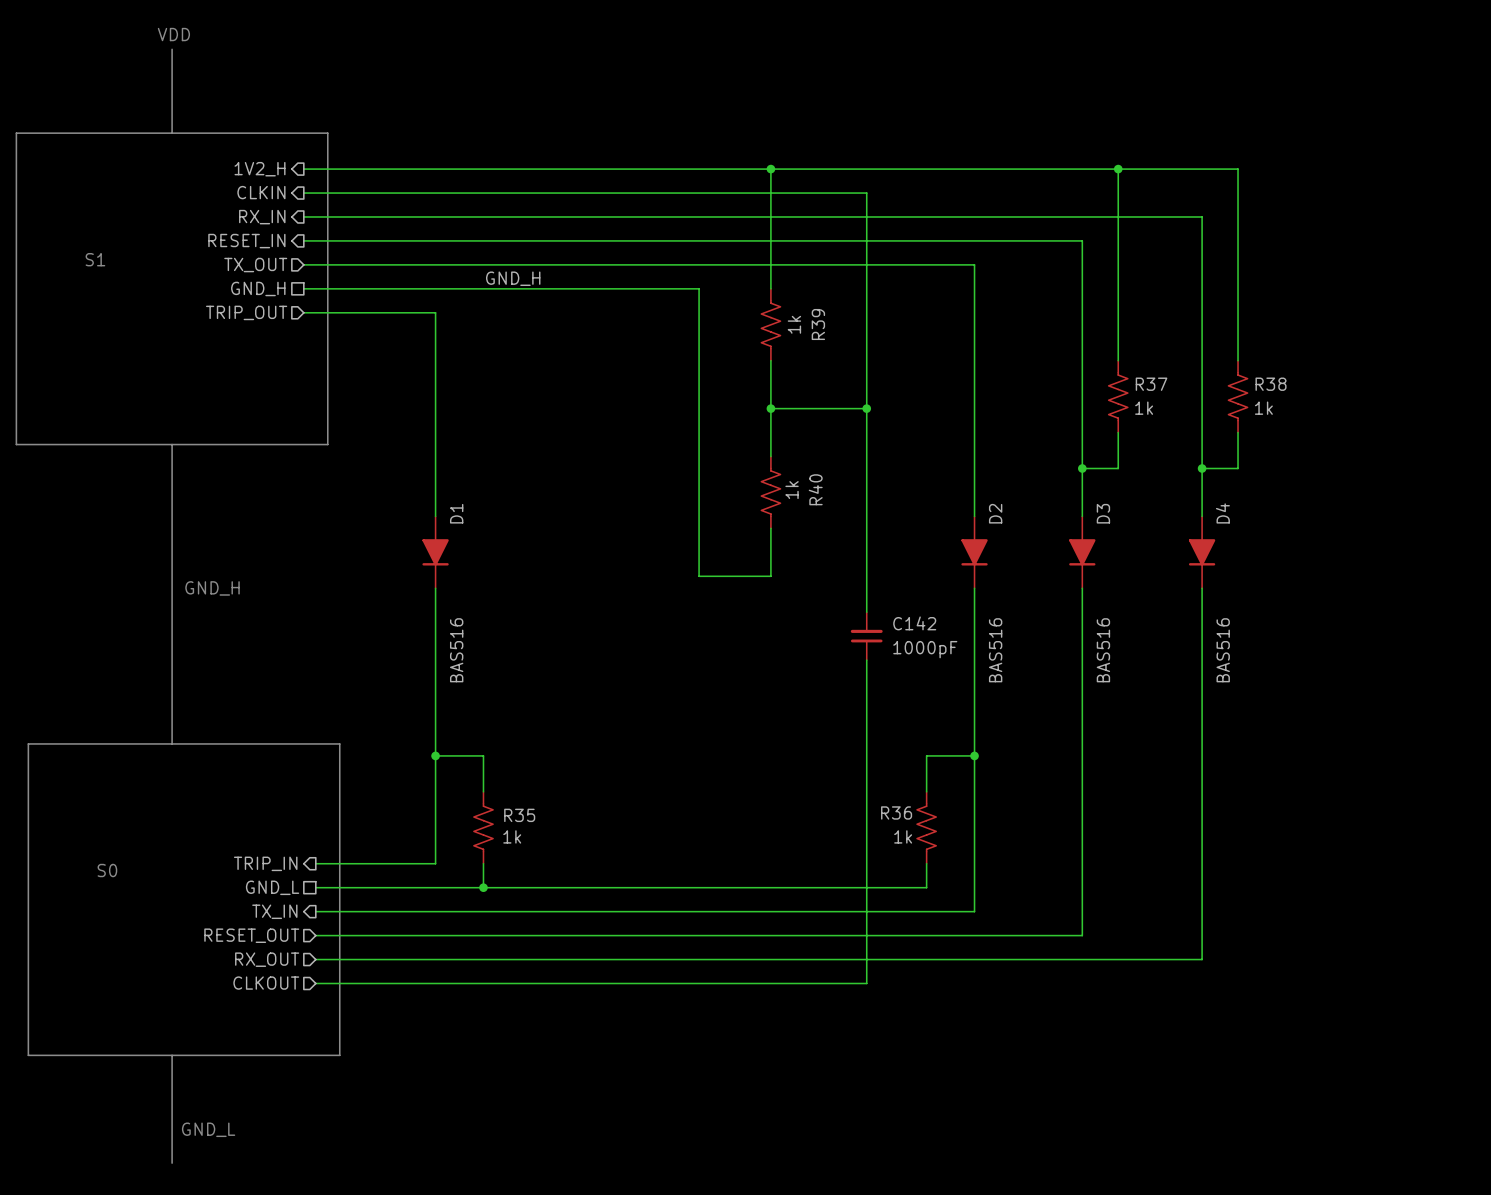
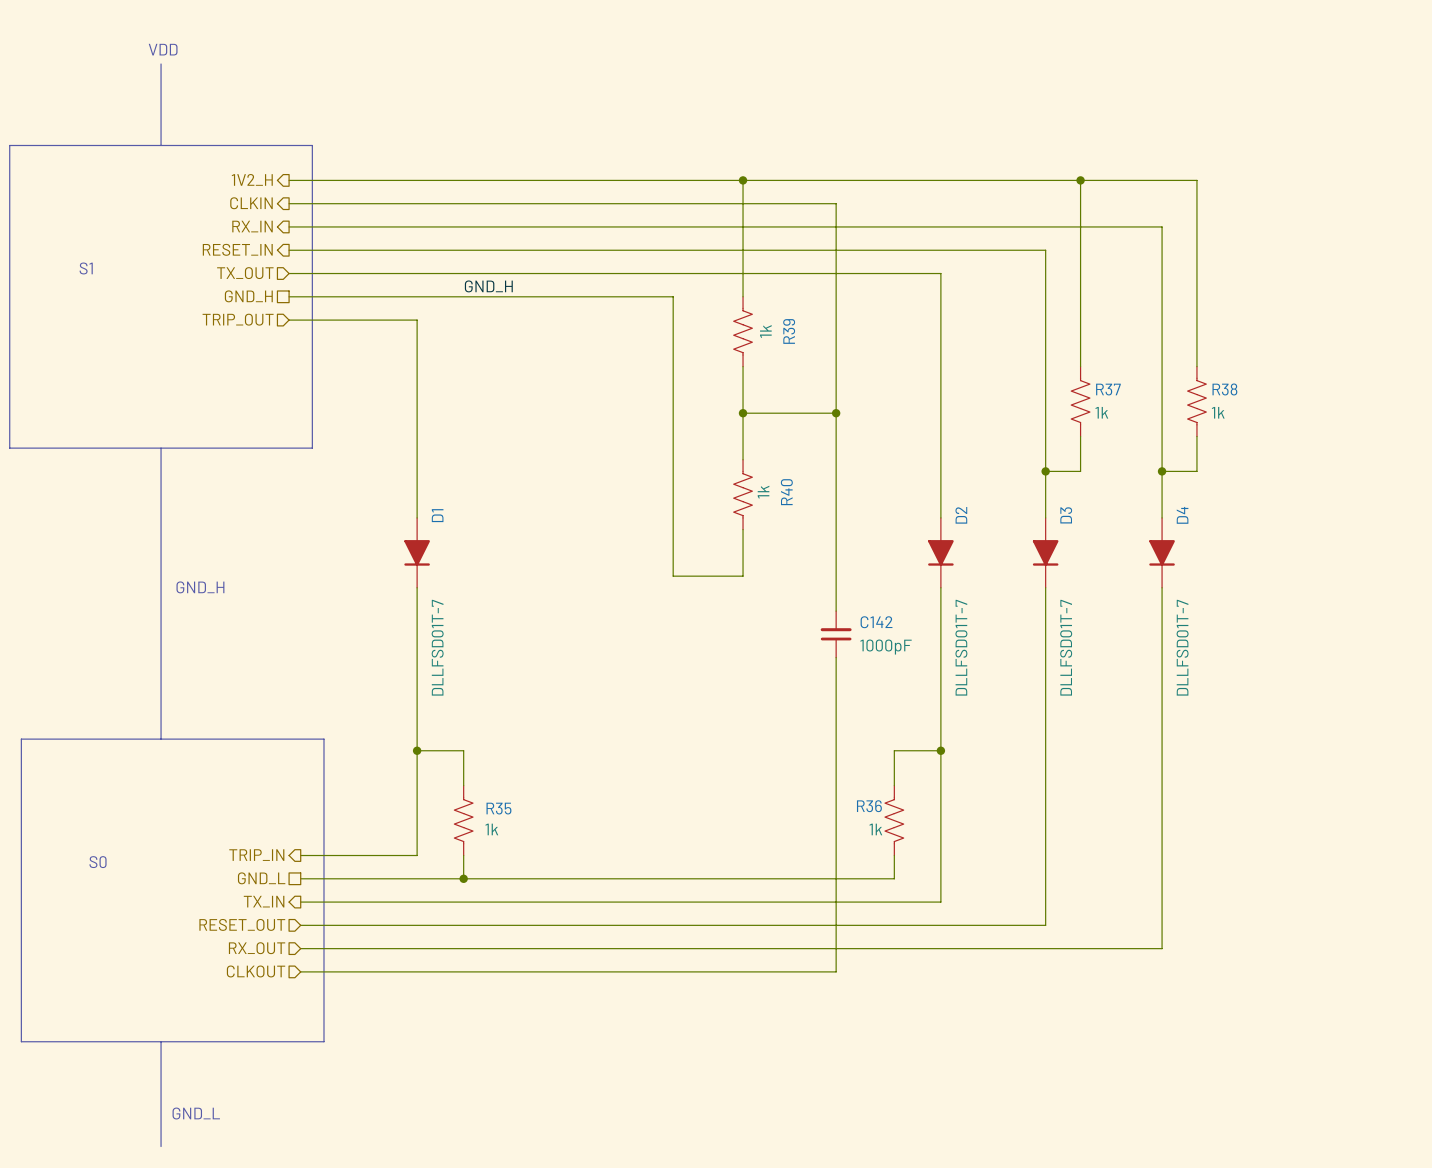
D1 value: BAS516 (456, 650) -> DLLFSD01T-7 (437, 647)
D2 value: BAS516 (995, 650) -> DLLFSD01T-7 (961, 647)
D3 value: BAS516 (1103, 650) -> DLLFSD01T-7 (1066, 647)
D4 value: BAS516 (1223, 650) -> DLLFSD01T-7 (1182, 647)

